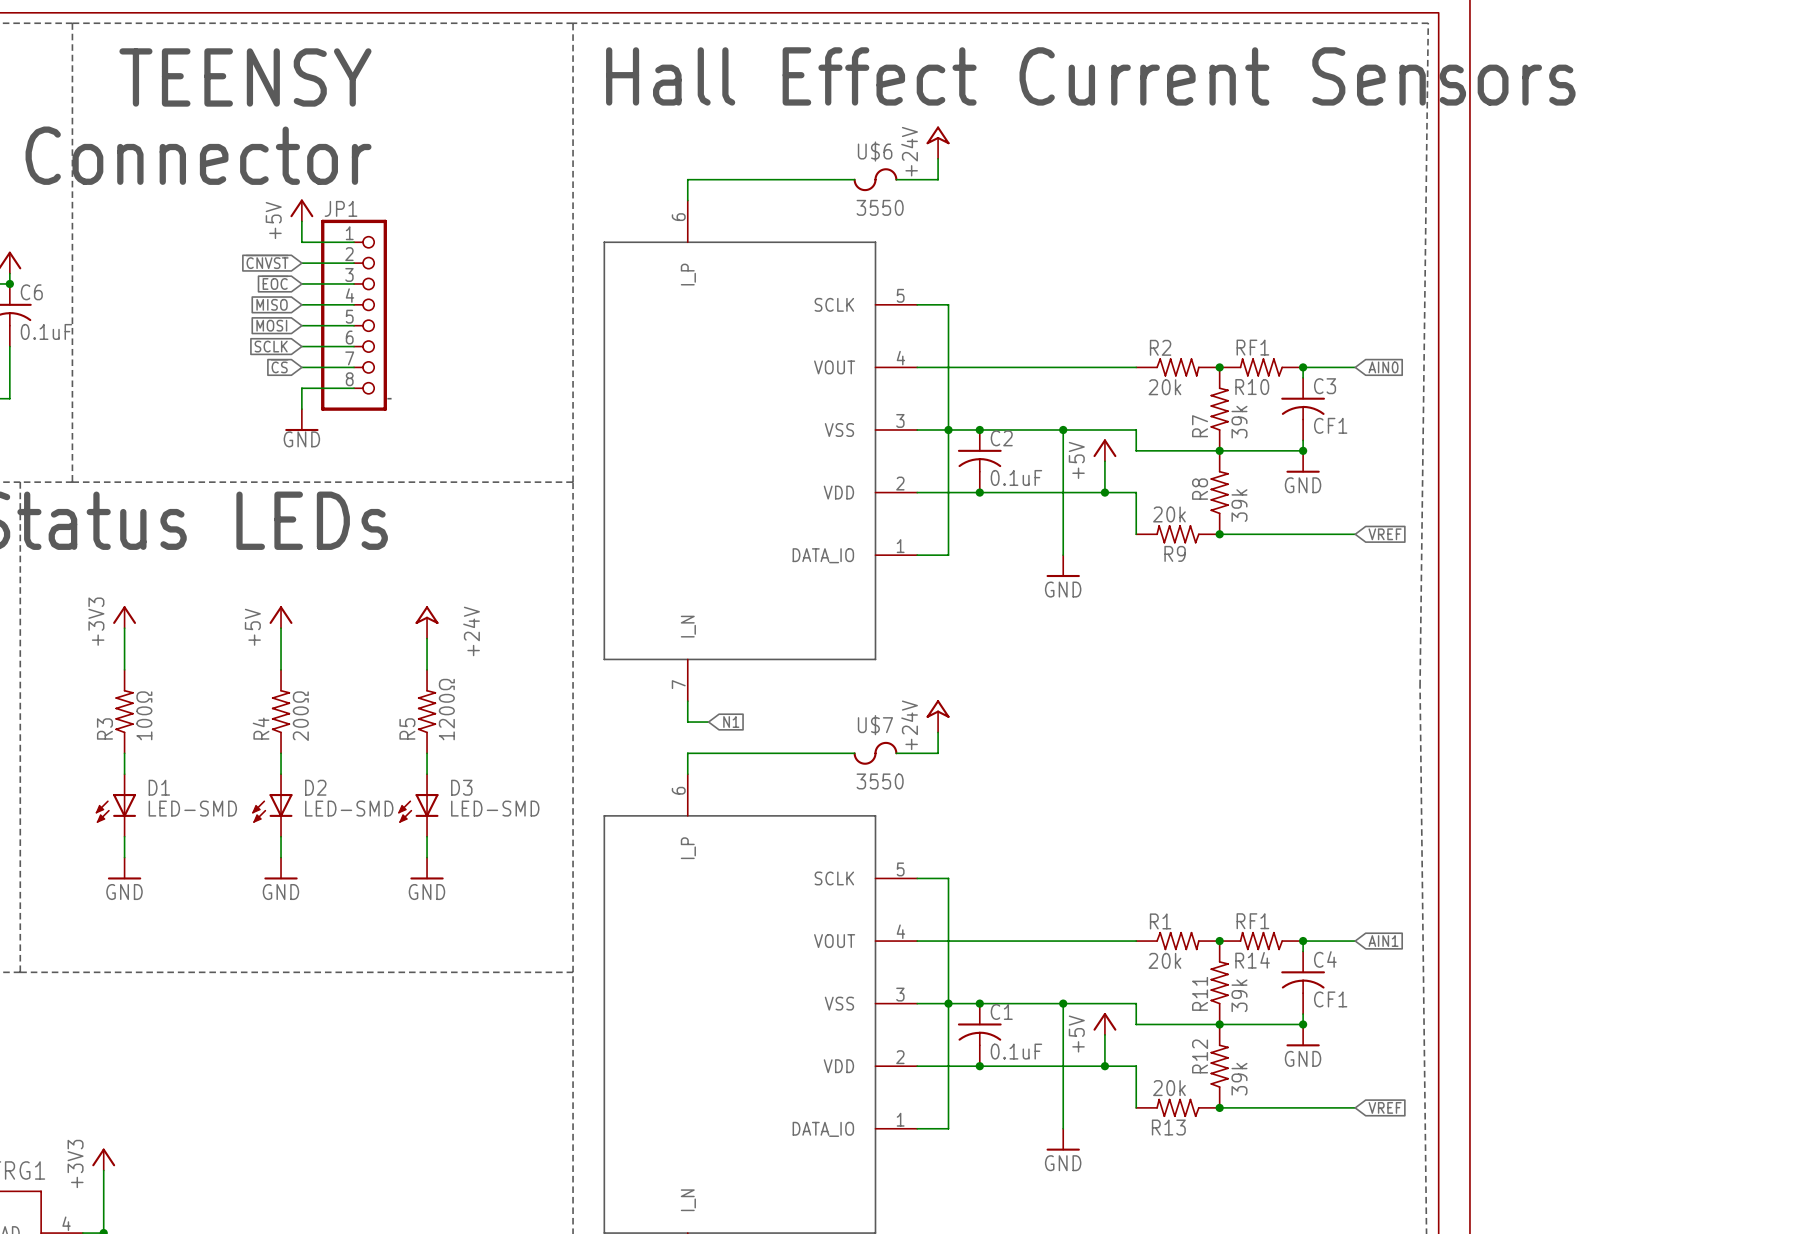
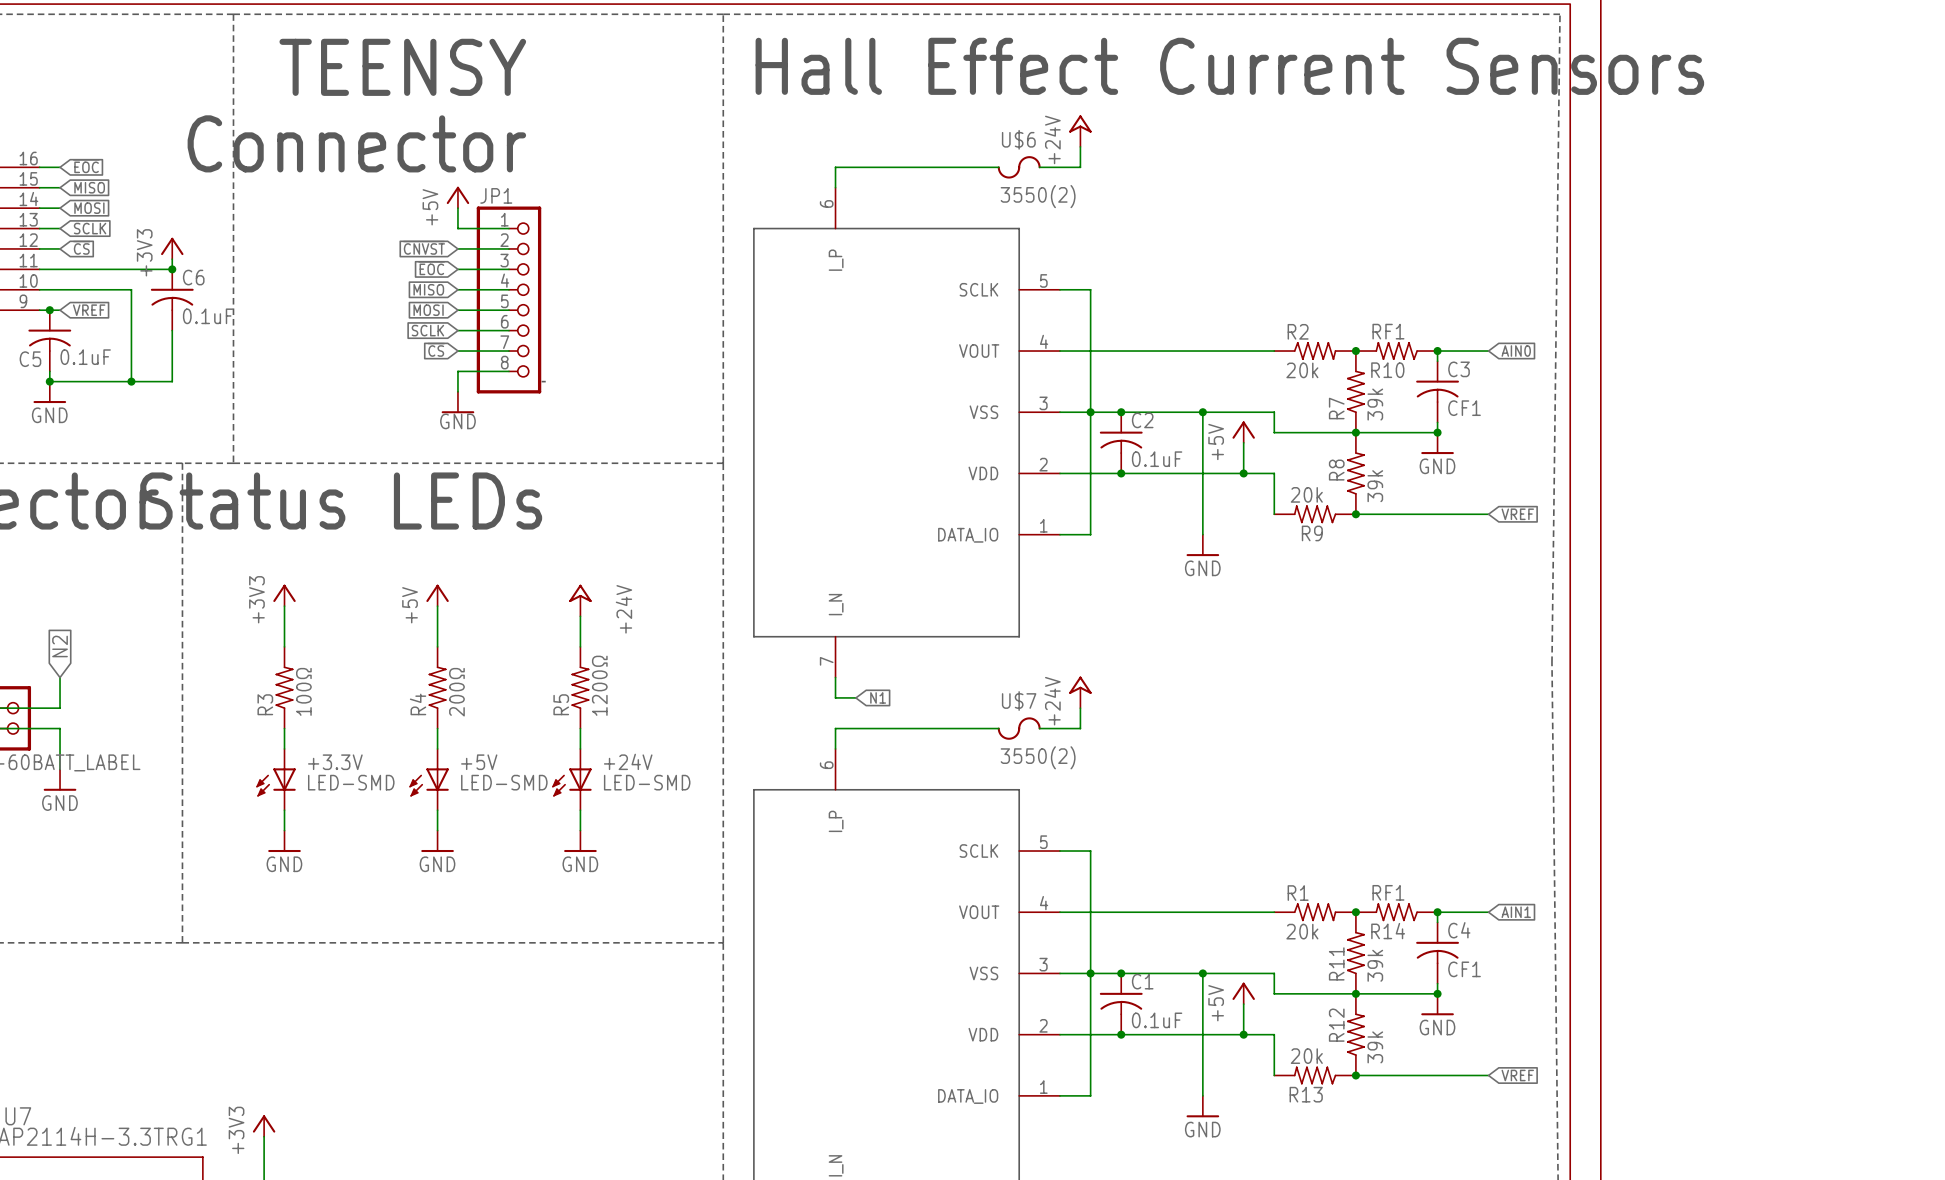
U$6 value: 3550 (880, 207) -> 3550(2) (1038, 196)
U$7 value: 3550 (880, 781) -> 3550(2) (1038, 757)
D1 name: D1 (159, 787) -> +3.3V (335, 762)
D2 name: D2 (315, 787) -> +5V (479, 762)
D3 name: D3 (461, 787) -> +24V (628, 761)

